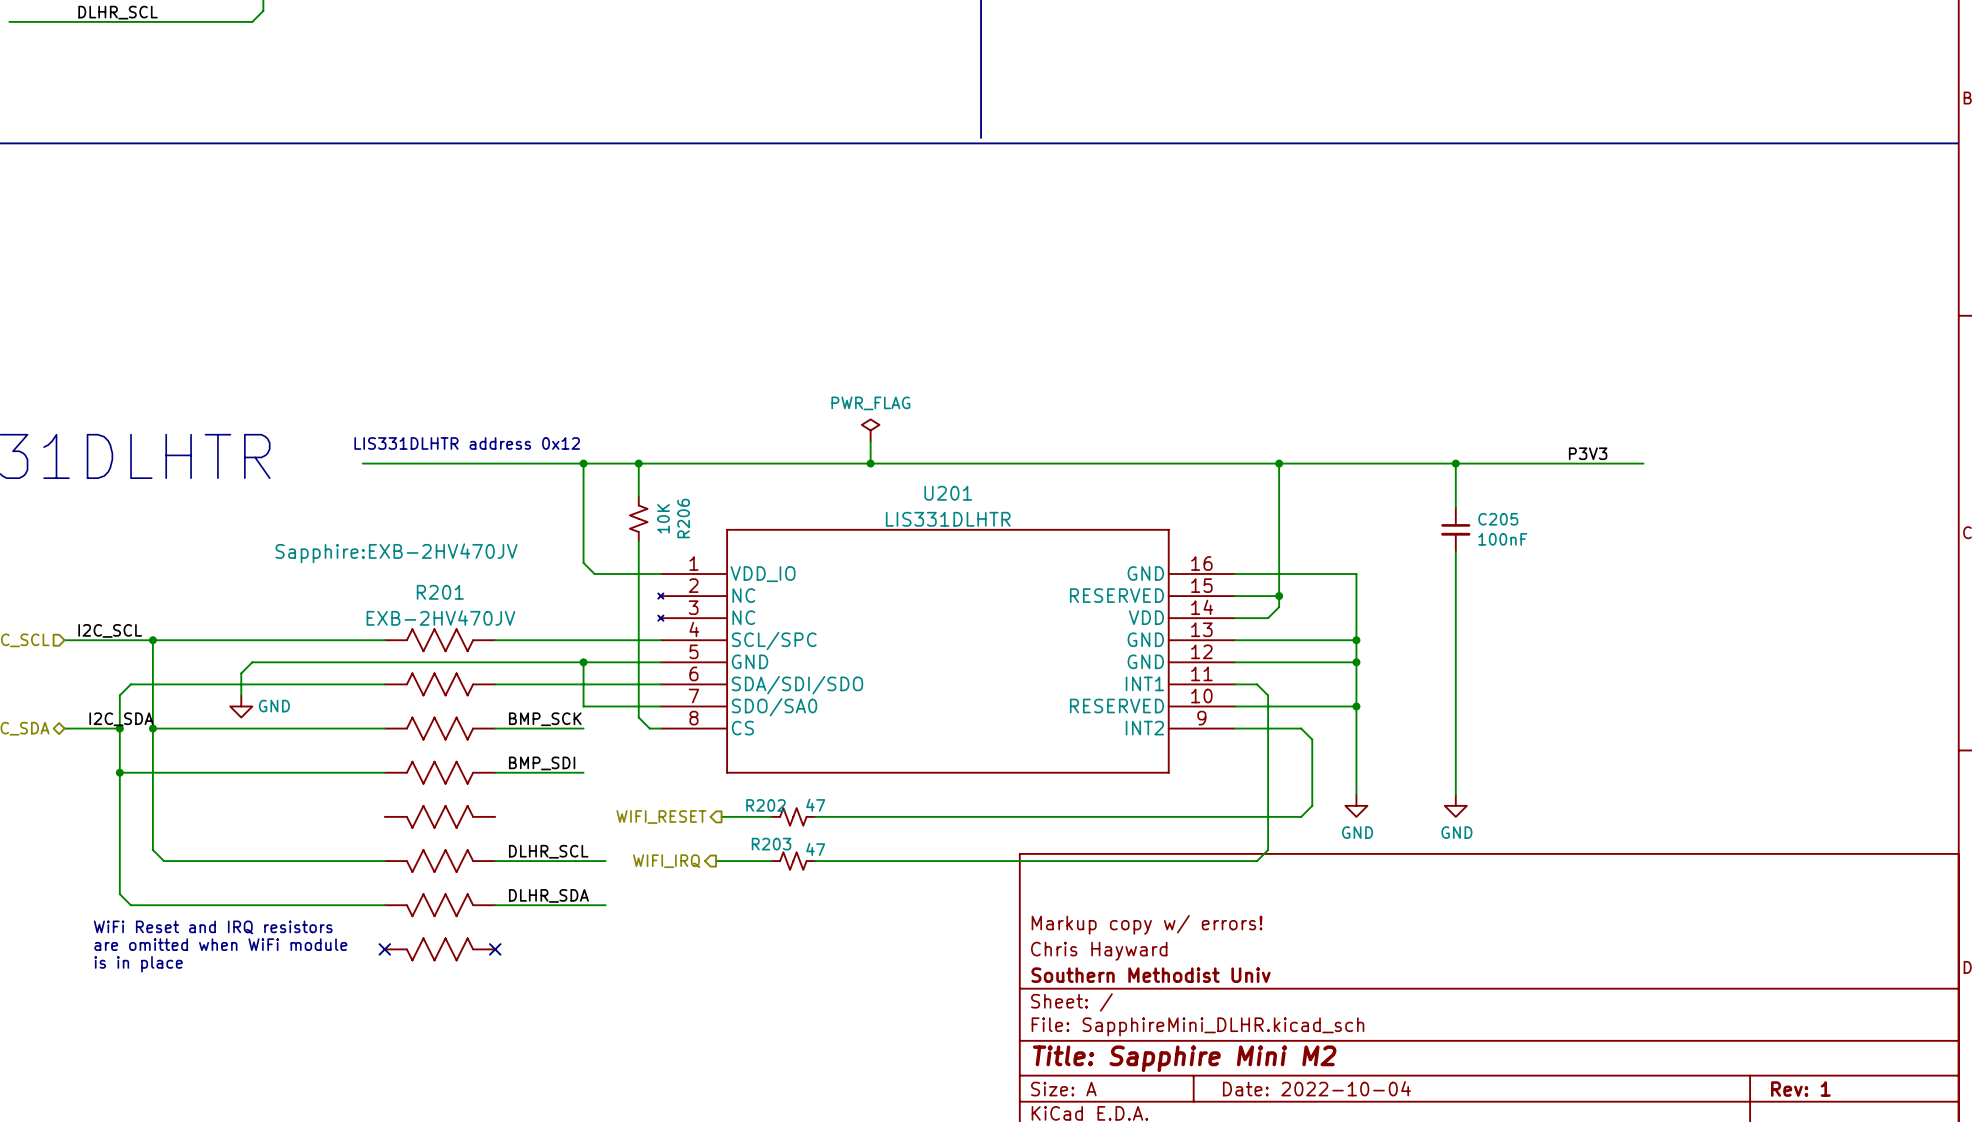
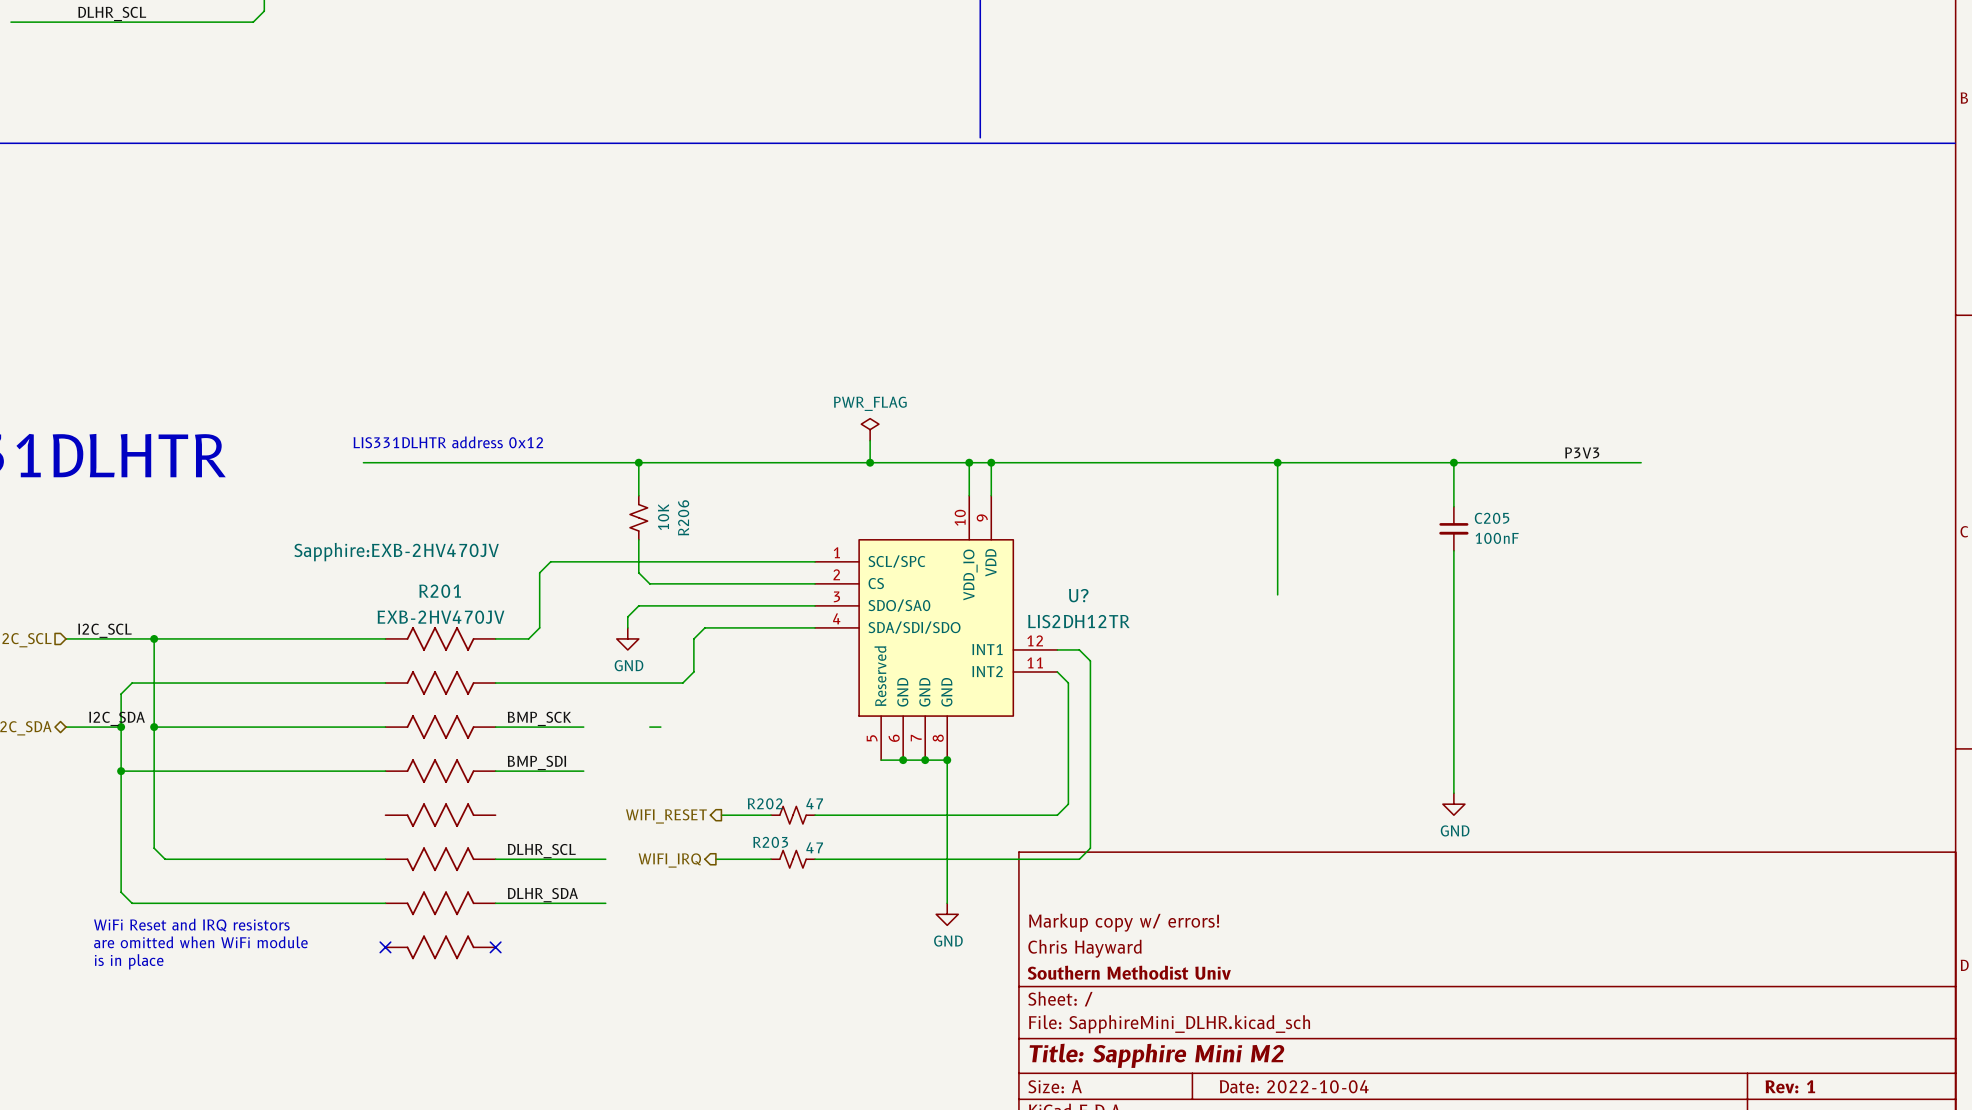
wire: (583, 463) (583, 562) (594, 573) (660, 573) -> none
junction: (583, 463) -> none
wire: none -> (969, 462) (969, 495)
junction: none -> (969, 462)
wire: none -> (991, 462) (991, 495)
junction: none -> (991, 462)
wire: (638, 573) (638, 717) (649, 728) -> (638, 572) (649, 583) (815, 583)
wire: (1234, 573) (1356, 573) (1356, 794) -> none
wire: (1234, 596) (1279, 596) (1279, 607) (1268, 618) (1234, 618) -> none
junction: (1279, 596) -> none
wire: none -> (815, 605) (638, 605) (627, 616) (627, 627)
wire: none -> (815, 627) (704, 627) (693, 638) (693, 672) (682, 683) (660, 683)
U?: none -> LIS2DH12TR (936, 627)
wire: (528, 640) (660, 640) -> (528, 638) (539, 627) (539, 572) (550, 561) (815, 561)
power symbol: none -> GND (627, 638)
wire: (1234, 640) (1356, 640) -> none
junction: (1356, 640) -> none
U201: LIS331DLHTR (946, 651) -> none
wire: (583, 662) (583, 706) (660, 706) -> none
junction: (583, 662) -> none
wire: (660, 662) (252, 662) (241, 673) (241, 695) -> none
wire: (1234, 662) (1356, 662) -> none
junction: (1356, 662) -> none
wire: (1234, 684) (1257, 684) (1268, 695) (1268, 850) (1257, 861) (1080, 861) -> (1057, 649) (1079, 649) (1090, 660) (1090, 848) (1079, 859)
power symbol: GND (241, 706) -> none
wire: (1234, 706) (1356, 706) -> none
junction: (1356, 706) -> none
wire: (1234, 728) (1301, 728) (1312, 739) (1312, 805) (1301, 816) (1058, 816) -> (1057, 672) (1068, 683) (1068, 804) (1057, 815)
wire: none -> (881, 760) (947, 760) (947, 903)
junction: none -> (903, 760)
junction: none -> (925, 760)
junction: none -> (947, 760)
power symbol: GND (1356, 805) -> none
power symbol: none -> GND (947, 914)

